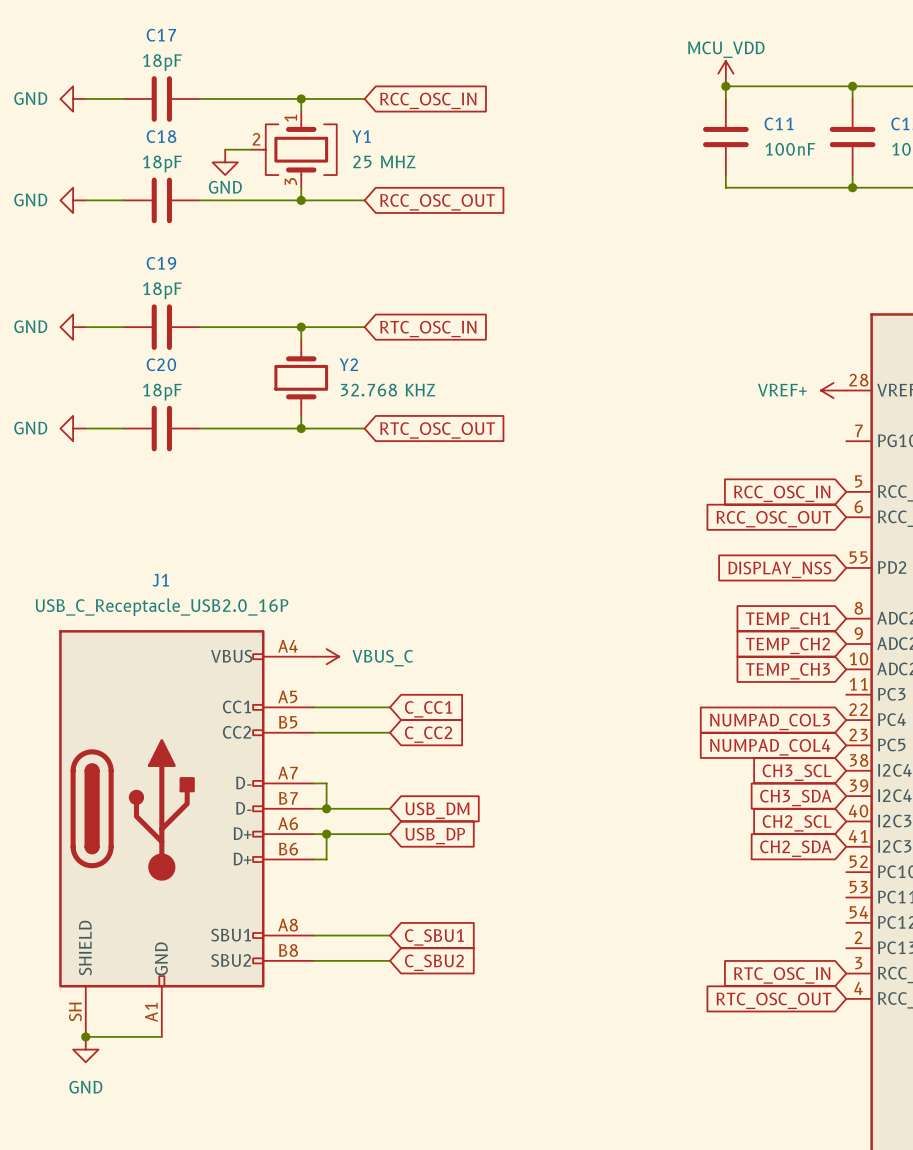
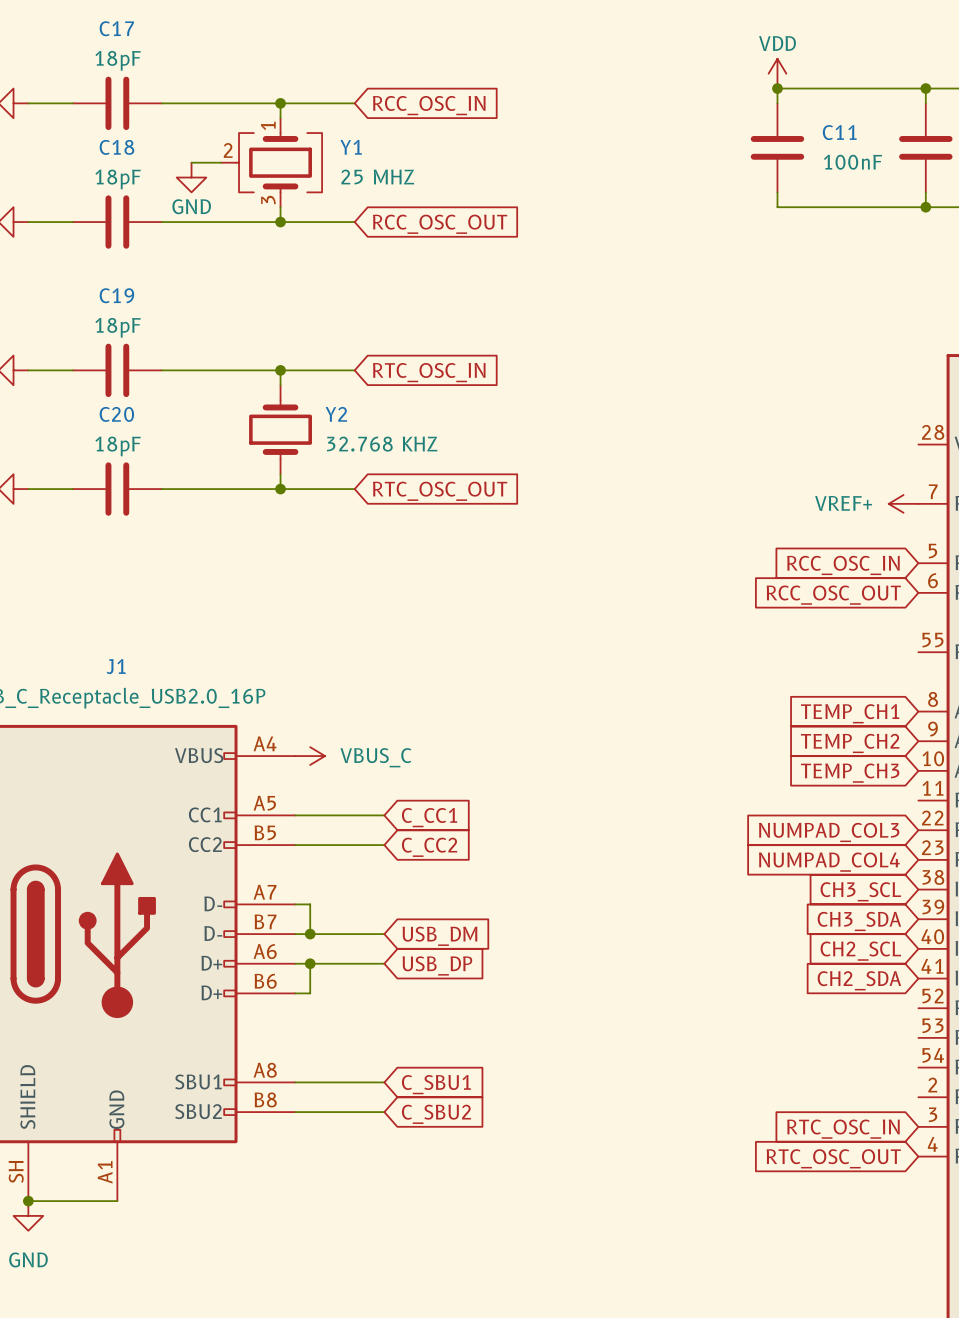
power symbol: MCU_VDD (725, 73) -> VDD (777, 73)
power symbol position: VREF+ (833, 390) -> VREF+ (903, 503)
global label: DISPLAY_NSS (779, 569) -> none

